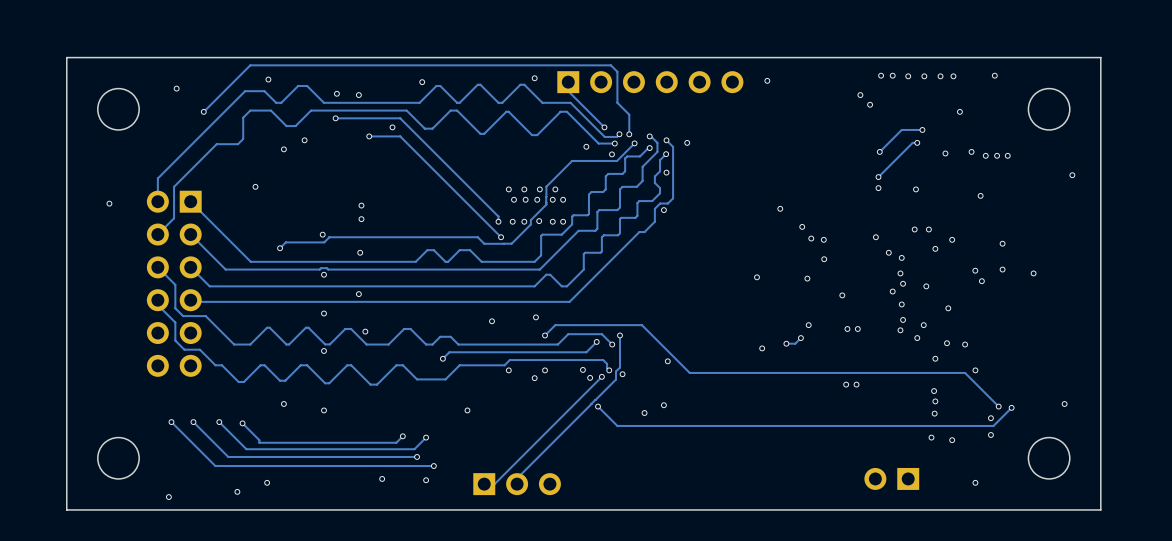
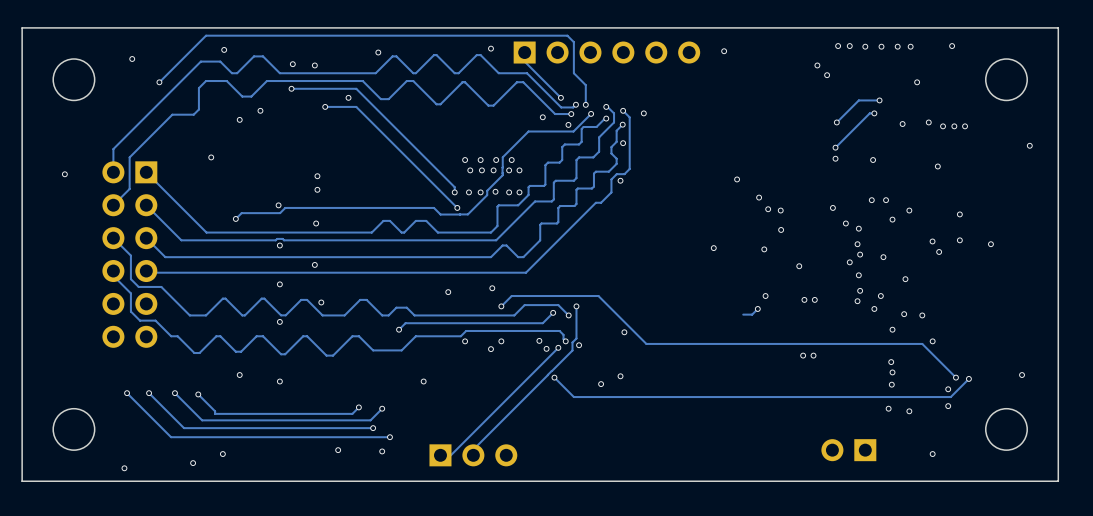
via: (786, 343) -> none
via: (762, 348) -> none

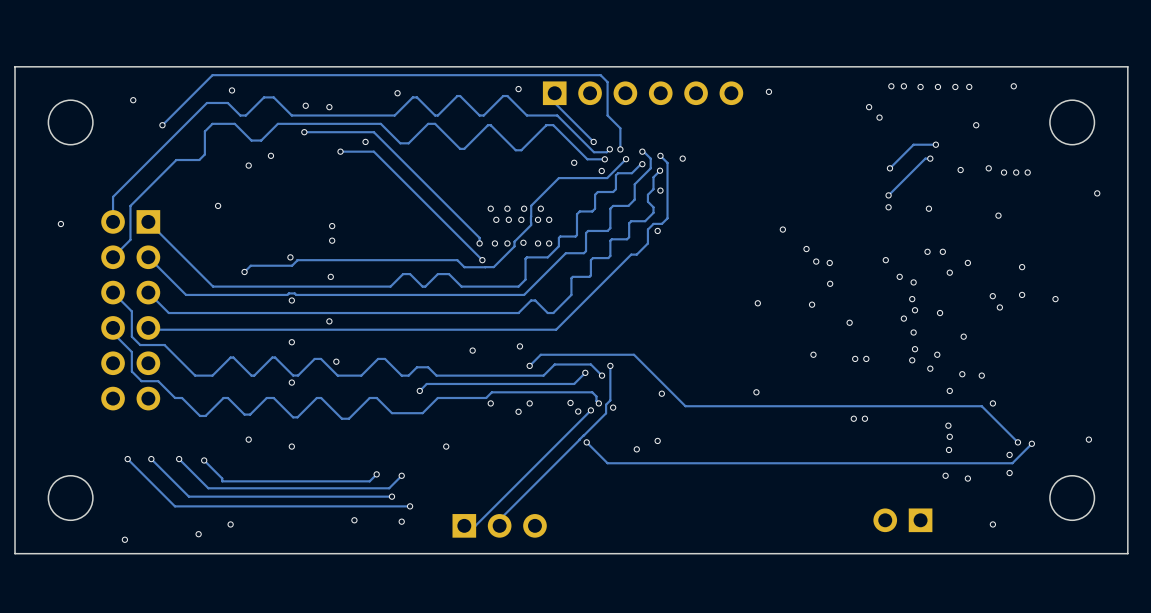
track: (757, 308) (752, 314) (743, 314) -> none
via position: (757, 308) -> (756, 392)

